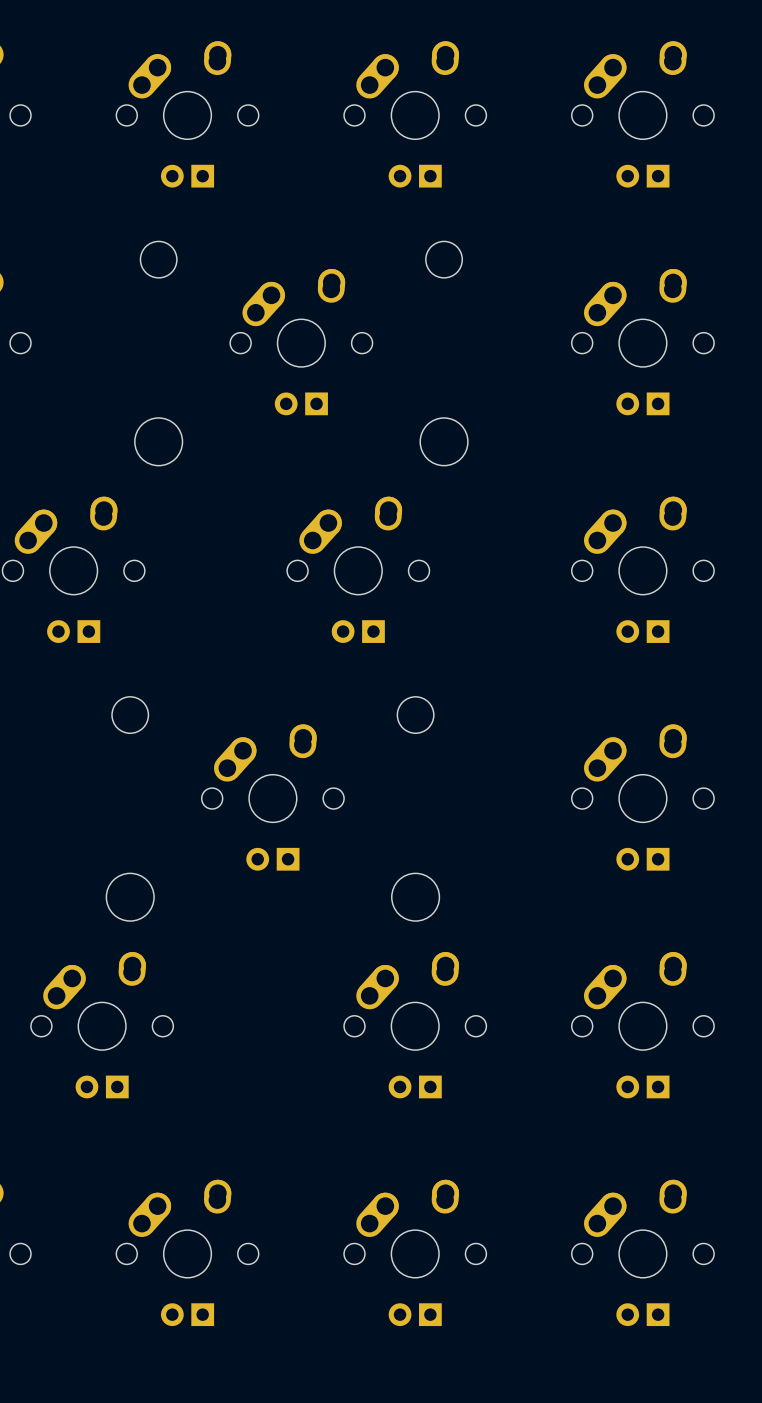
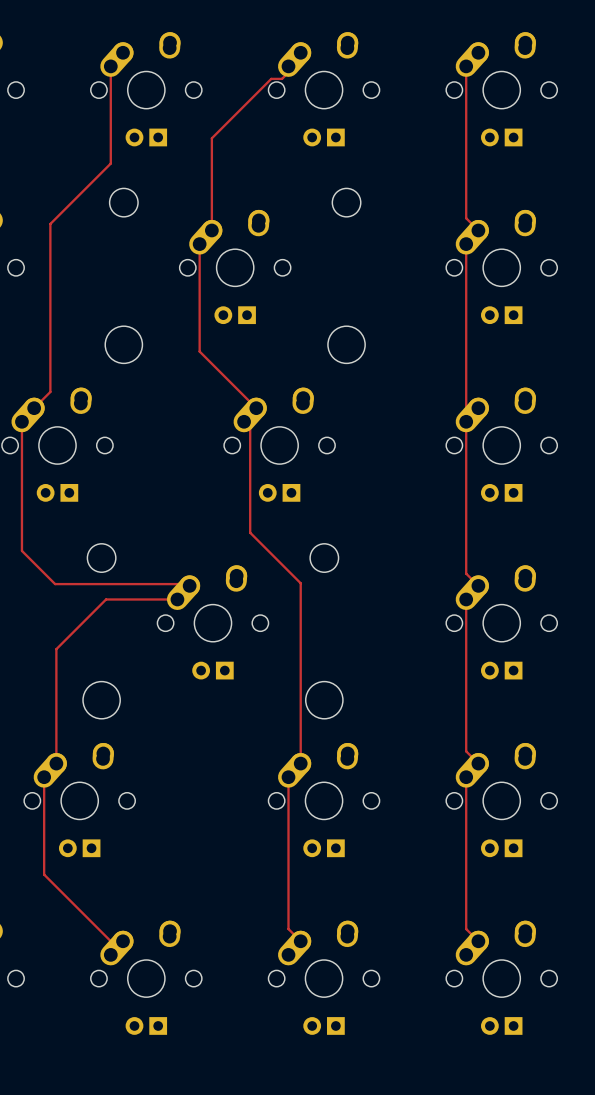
top track: none -> (110, 66) (110, 163) (50, 223) (50, 391) (34, 408)
top track: none -> (288, 66) (288, 72) (282, 78) (271, 78) (211, 138) (211, 230)
top track: none -> (466, 66) (466, 218) (478, 230)
top track: none -> (199, 244) (199, 351) (256, 408)
top track: none -> (466, 244) (466, 573) (478, 585)
top track: none -> (21, 421) (21, 550) (55, 584) (187, 584) (189, 585)
top track: none -> (244, 421) (250, 427) (250, 532) (300, 583) (300, 763)
top track: none -> (177, 599) (106, 599) (56, 649) (56, 763)
top track: none -> (466, 599) (466, 751) (478, 763)
top track: none -> (44, 777) (44, 874) (110, 941) (123, 941)
top track: none -> (288, 777) (288, 929) (300, 941)
top track: none -> (466, 777) (466, 929) (478, 941)

